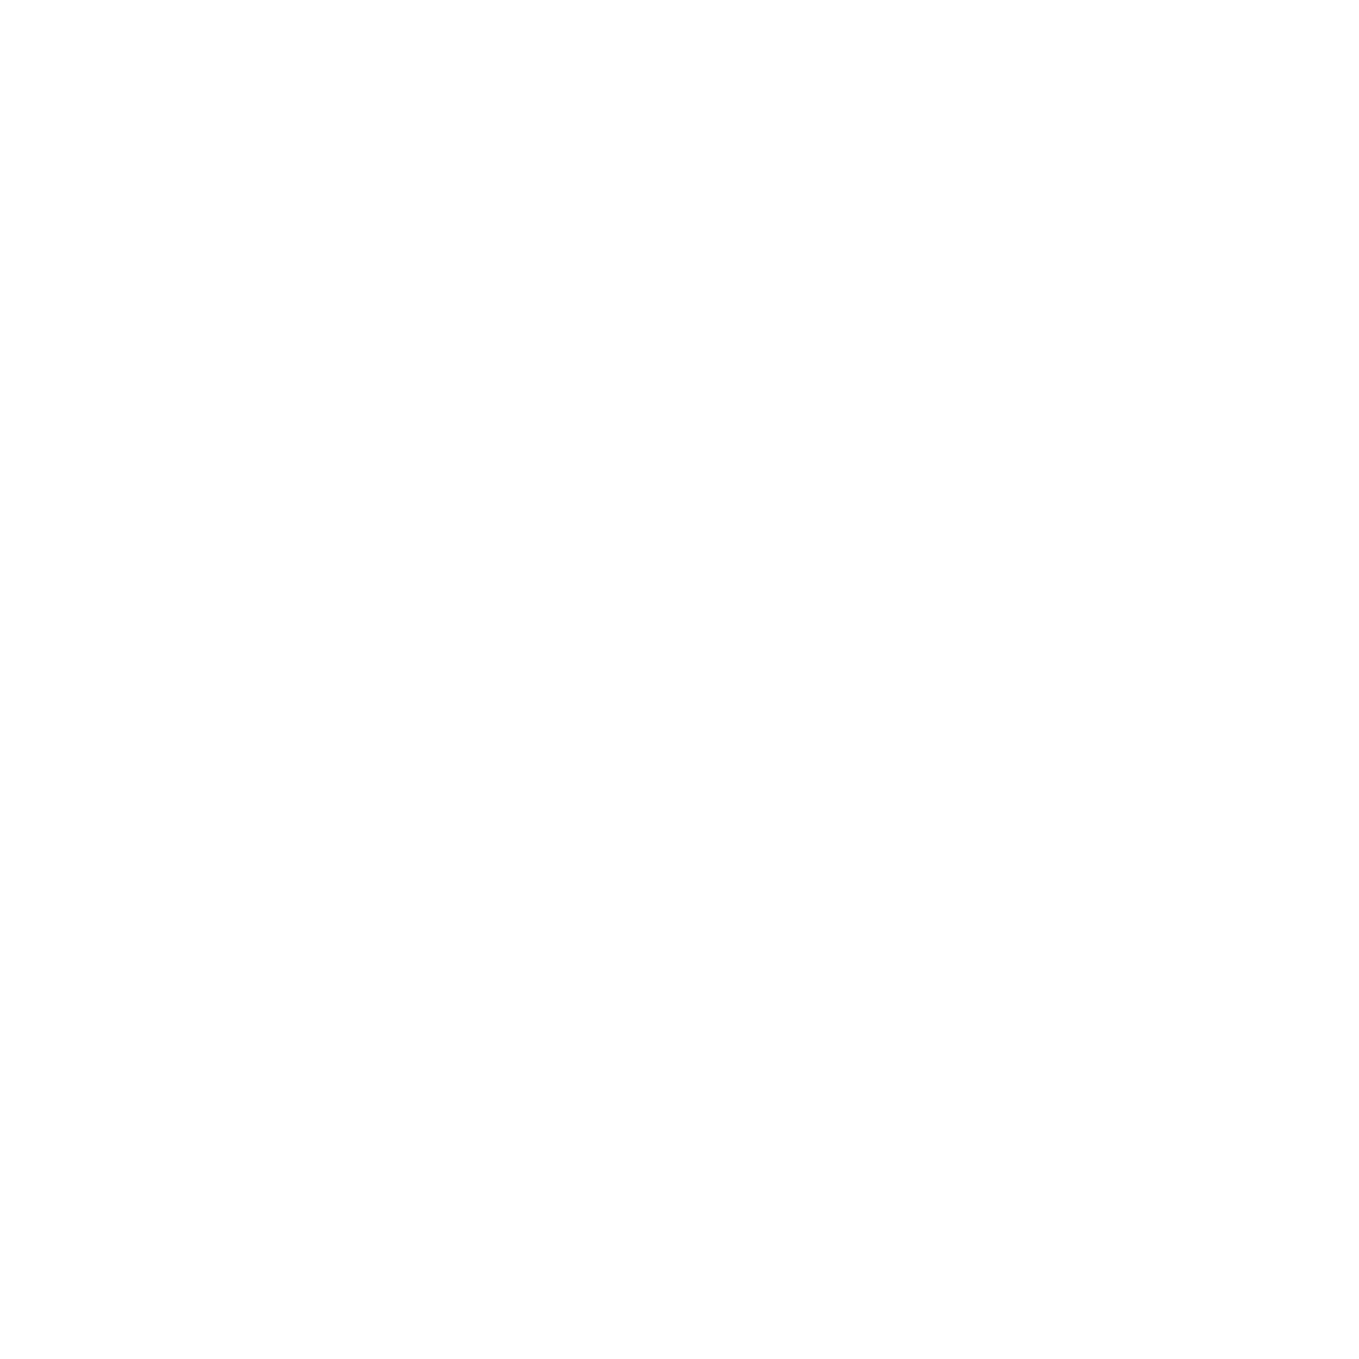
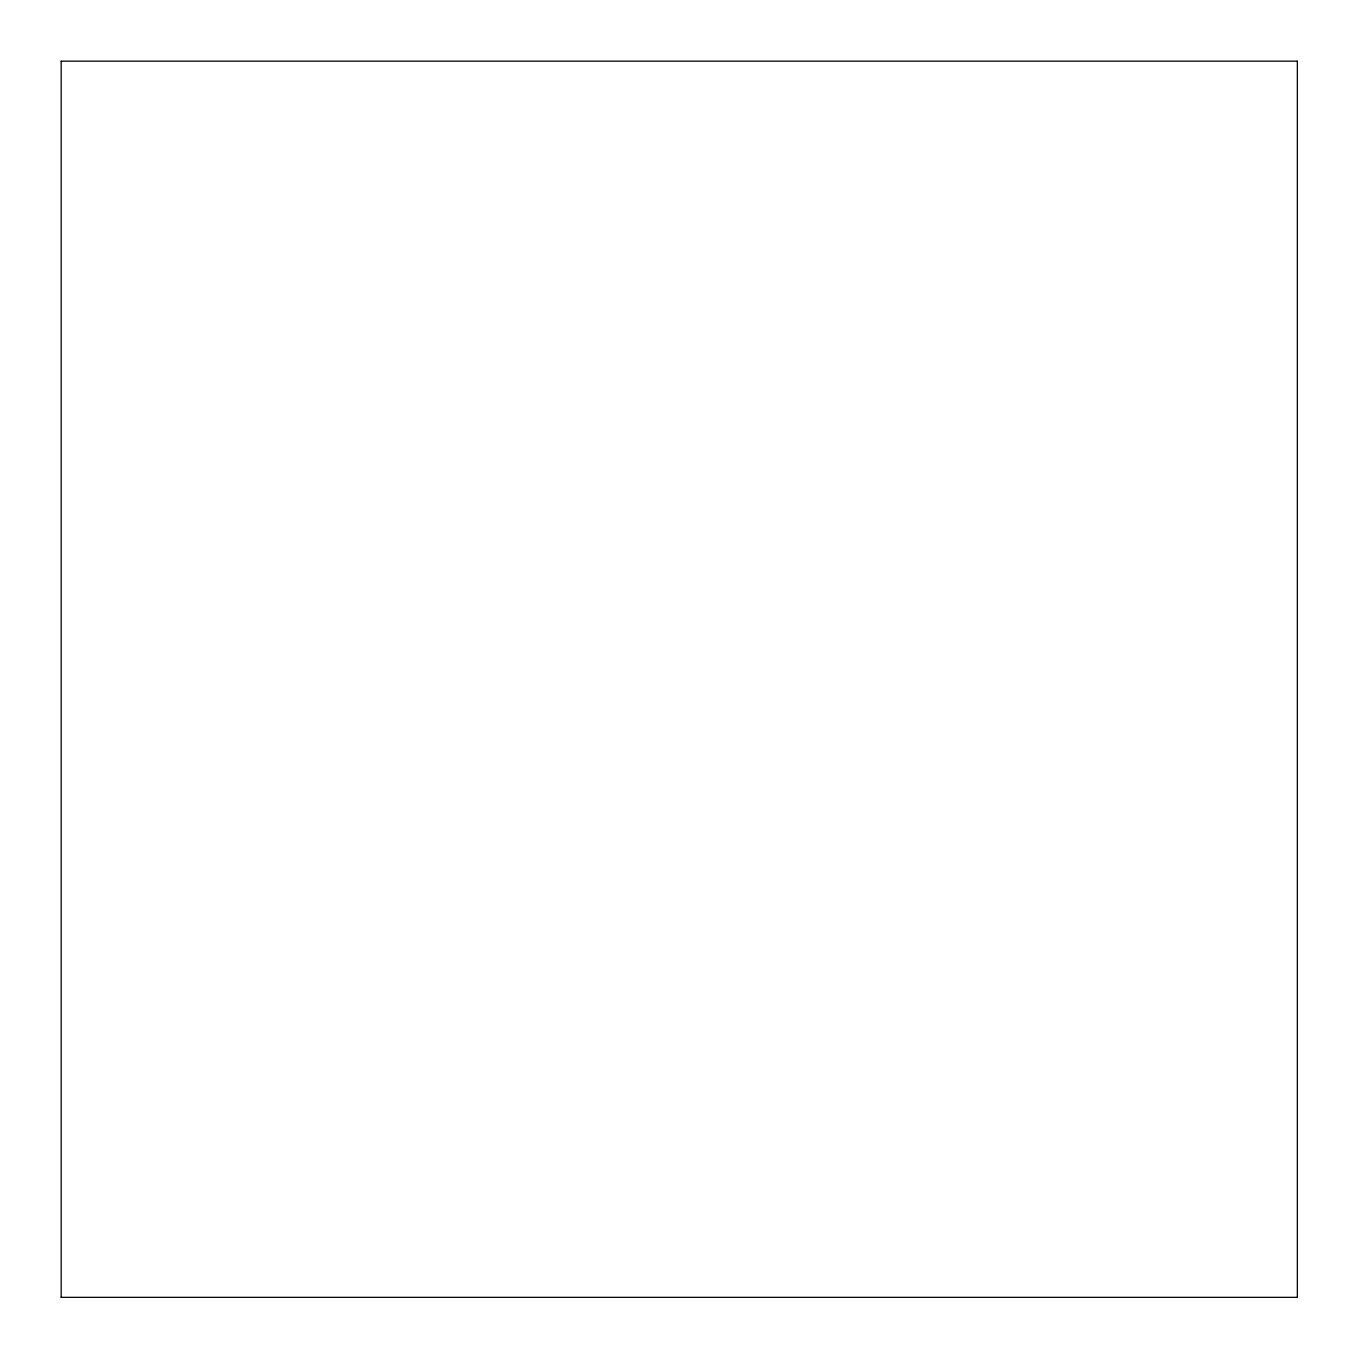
board edge: none -> (61, 61) (61, 1297) (1297, 1297) (1297, 61) (61, 61)

